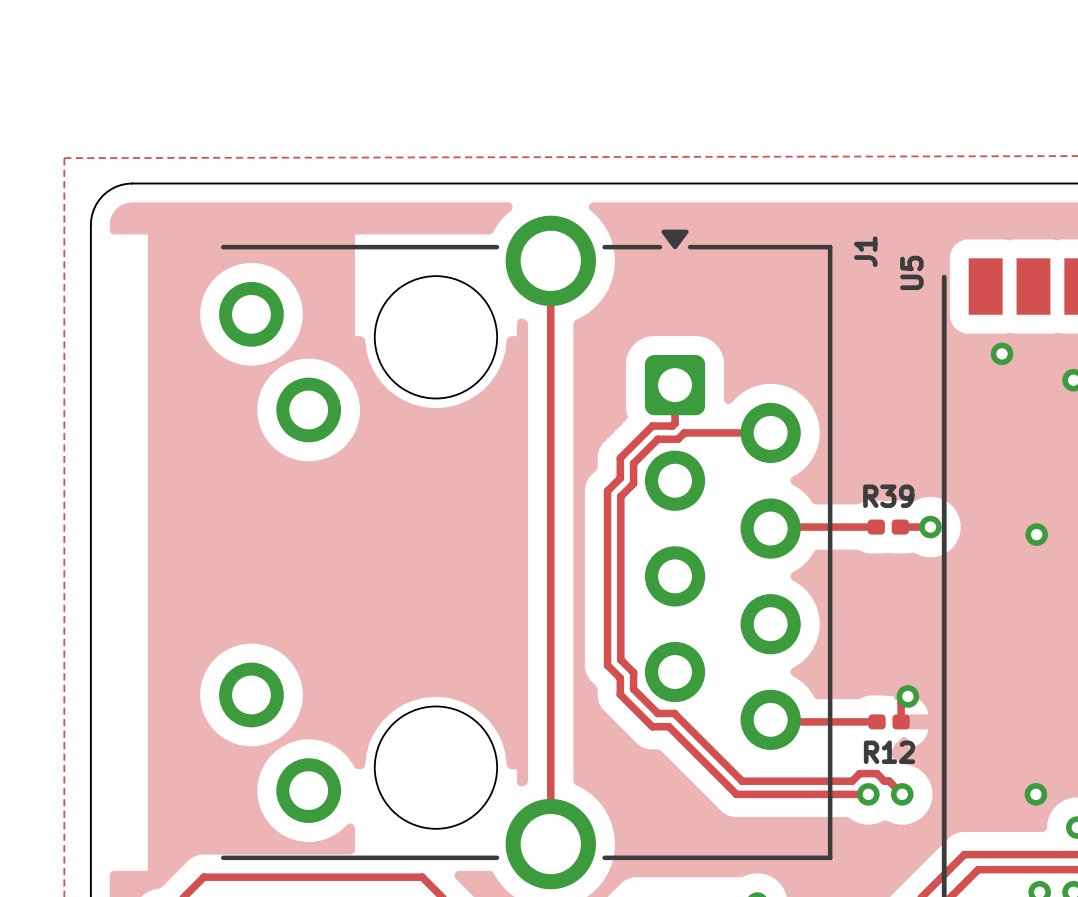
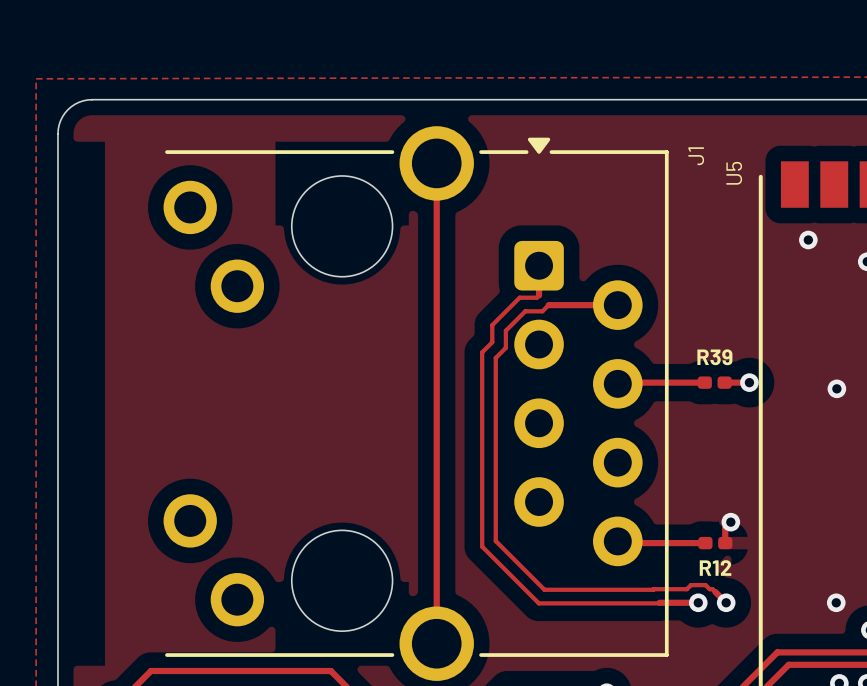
track: (675, 421) (672, 426) (652, 426) (620, 458) (620, 478) (607, 490) (607, 665) (620, 678) (620, 694) (652, 726) (668, 726) (736, 794) (821, 794) -> (539, 295) (536, 297) (519, 297) (492, 325) (492, 342) (482, 352) (482, 546) (538, 603) (659, 602)
track: (686, 432) (677, 439) (657, 439) (633, 463) (633, 483) (620, 496) (620, 659) (633, 672) (633, 689) (657, 713) (674, 713) (742, 781) (852, 781) (859, 773) (876, 773) (884, 781) (889, 781) -> (548, 305) (542, 311) (525, 311) (505, 330) (505, 347) (495, 358) (495, 541) (544, 589) (686, 589) (690, 585) (705, 585) (715, 591)

